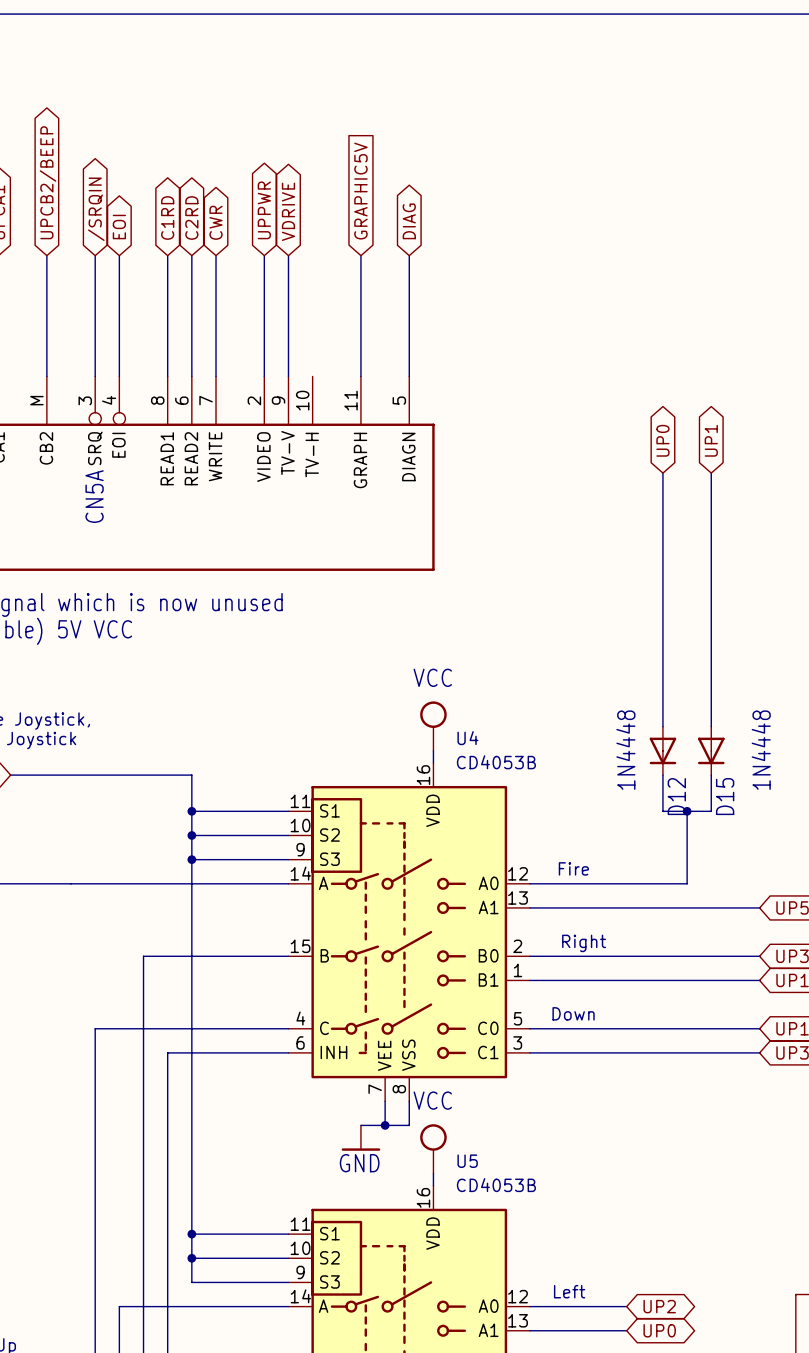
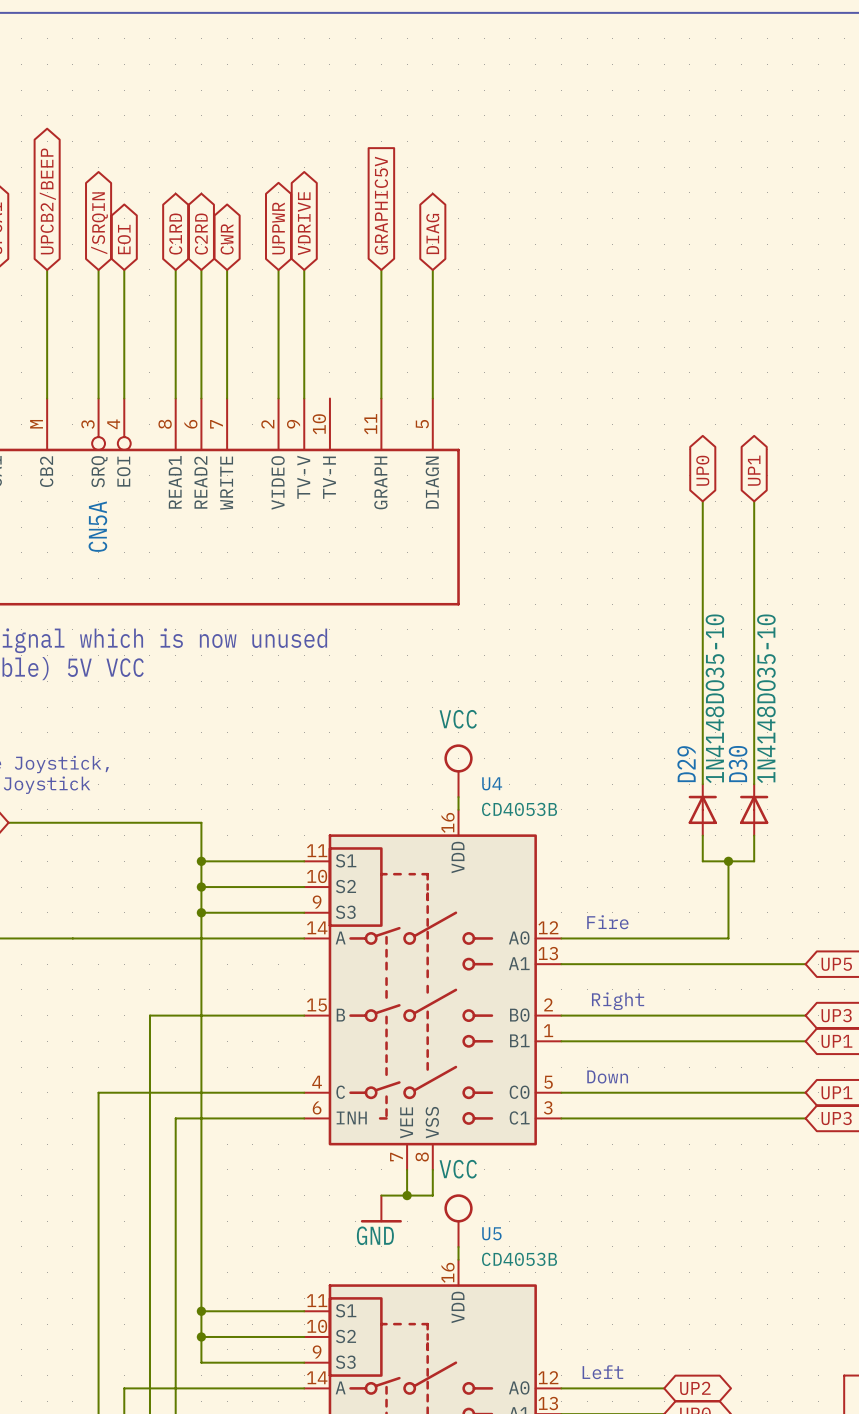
D12: 1N4448 (662, 750) -> none
D15: 1N4448 (711, 750) -> none
D29: none -> 1N4148DO35-10 (702, 809)
D30: none -> 1N4148DO35-10 (754, 809)

